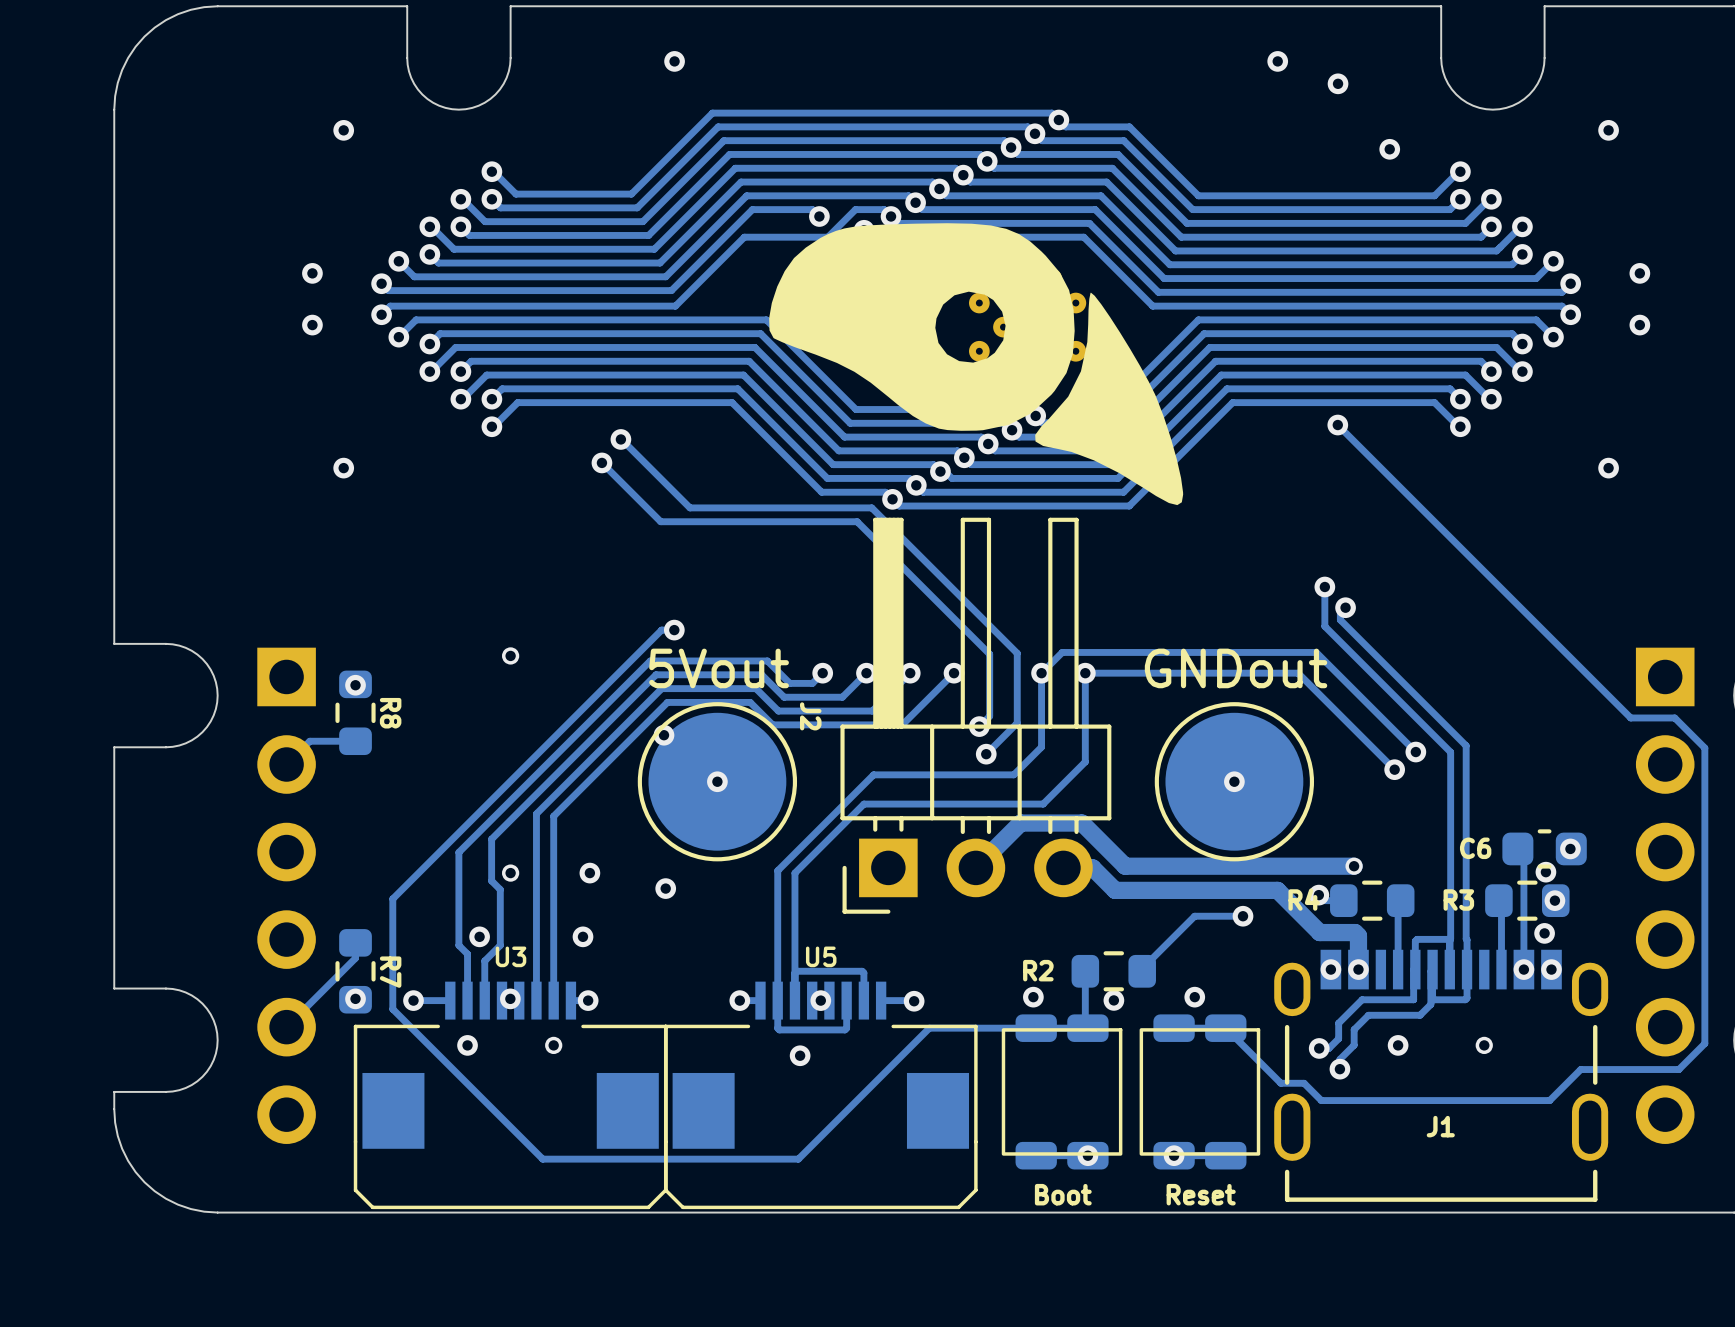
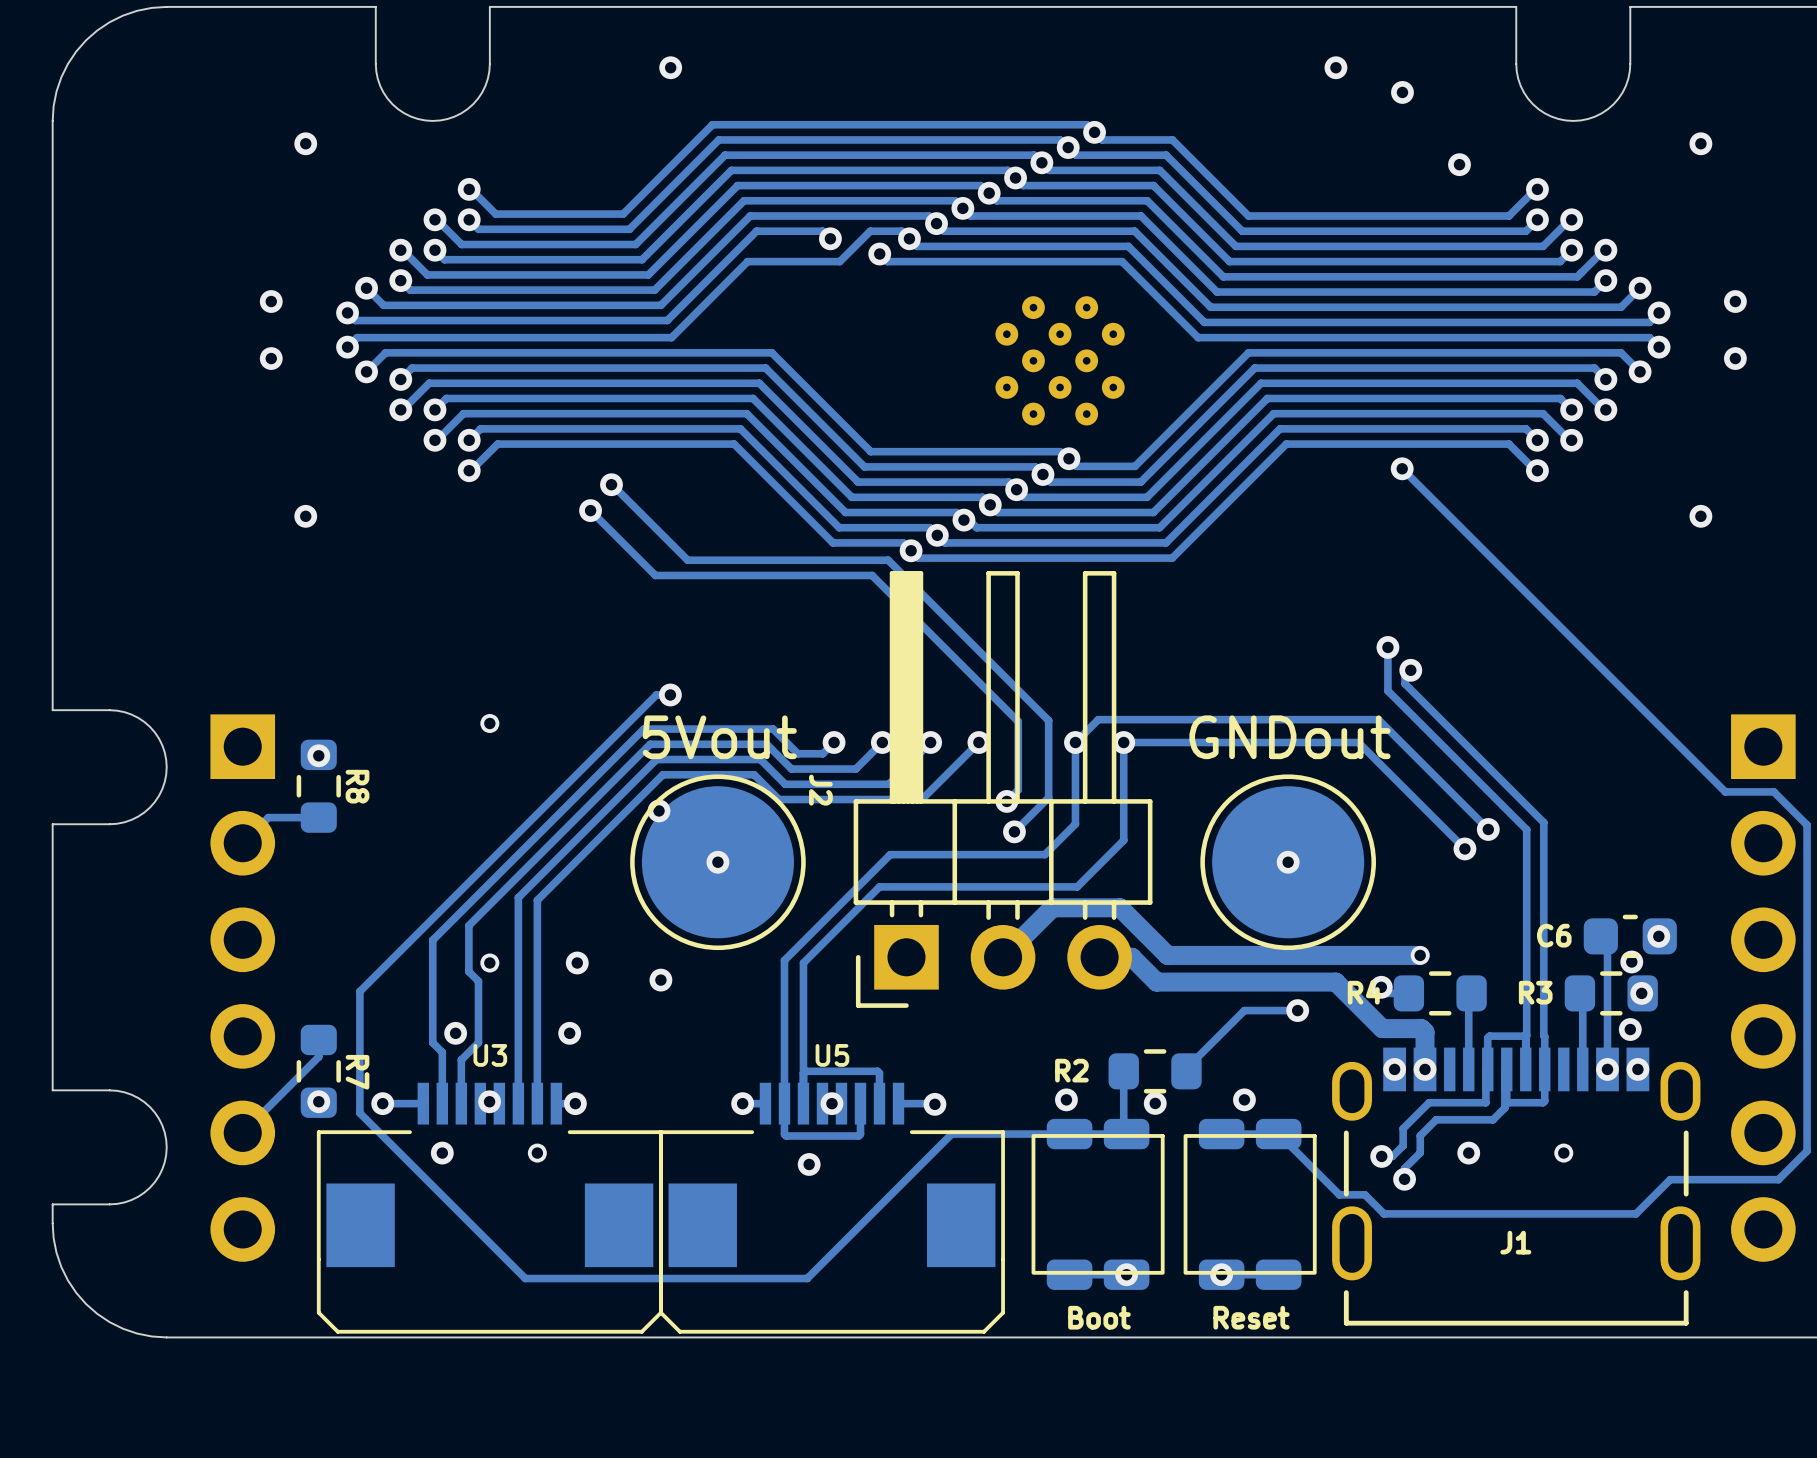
drawing: [769, 223, 1184, 506] -> none

